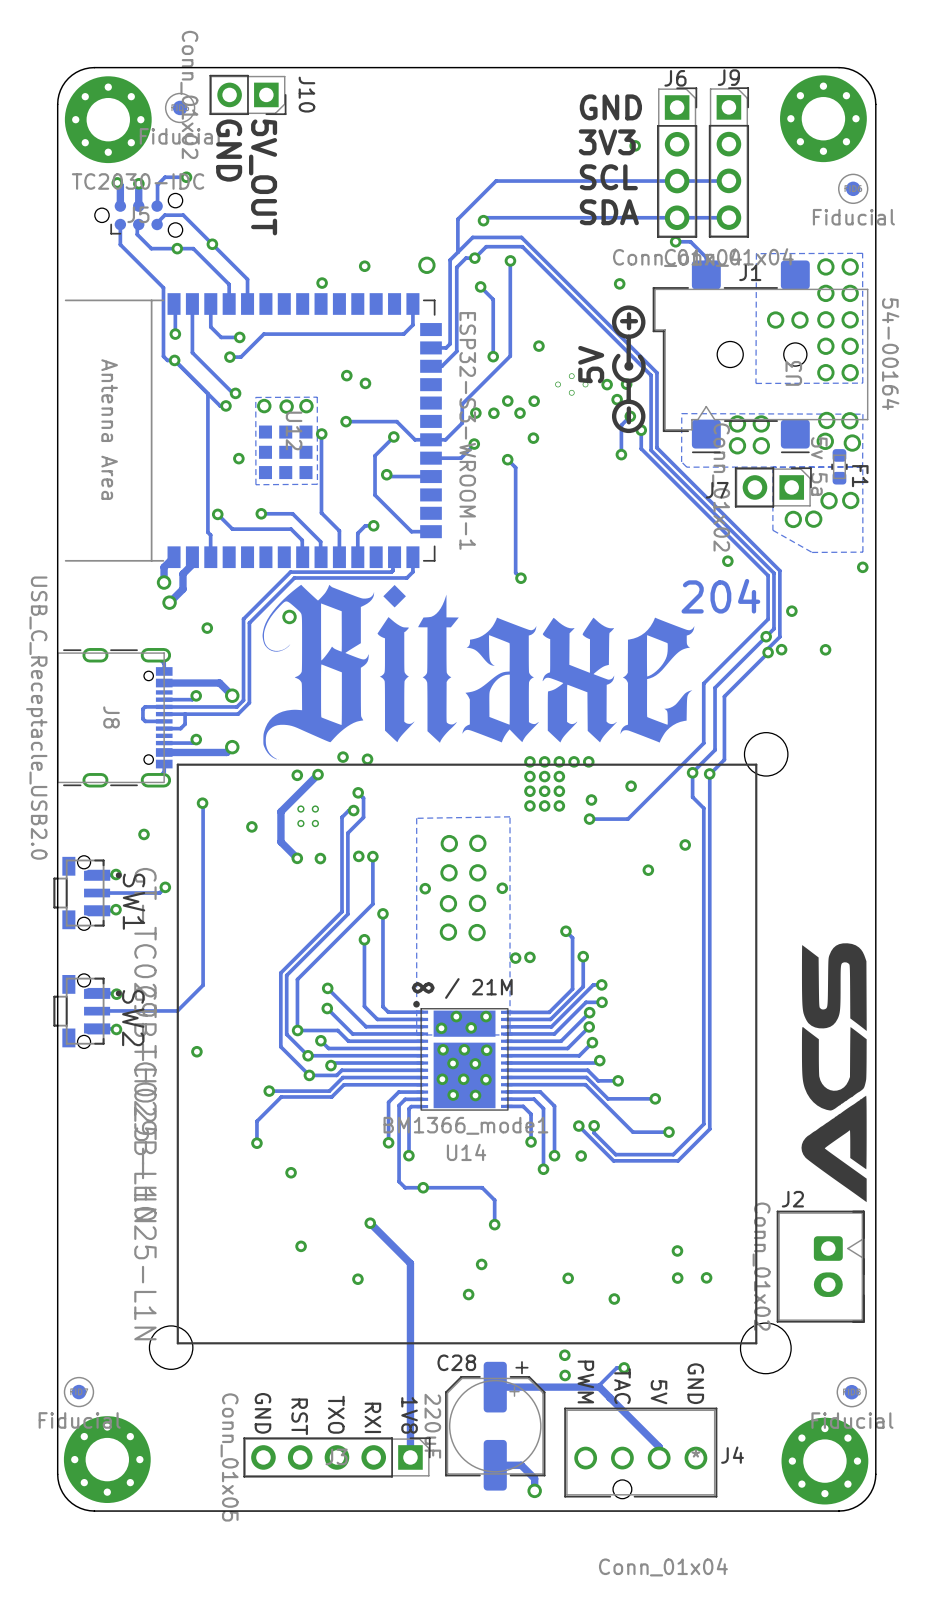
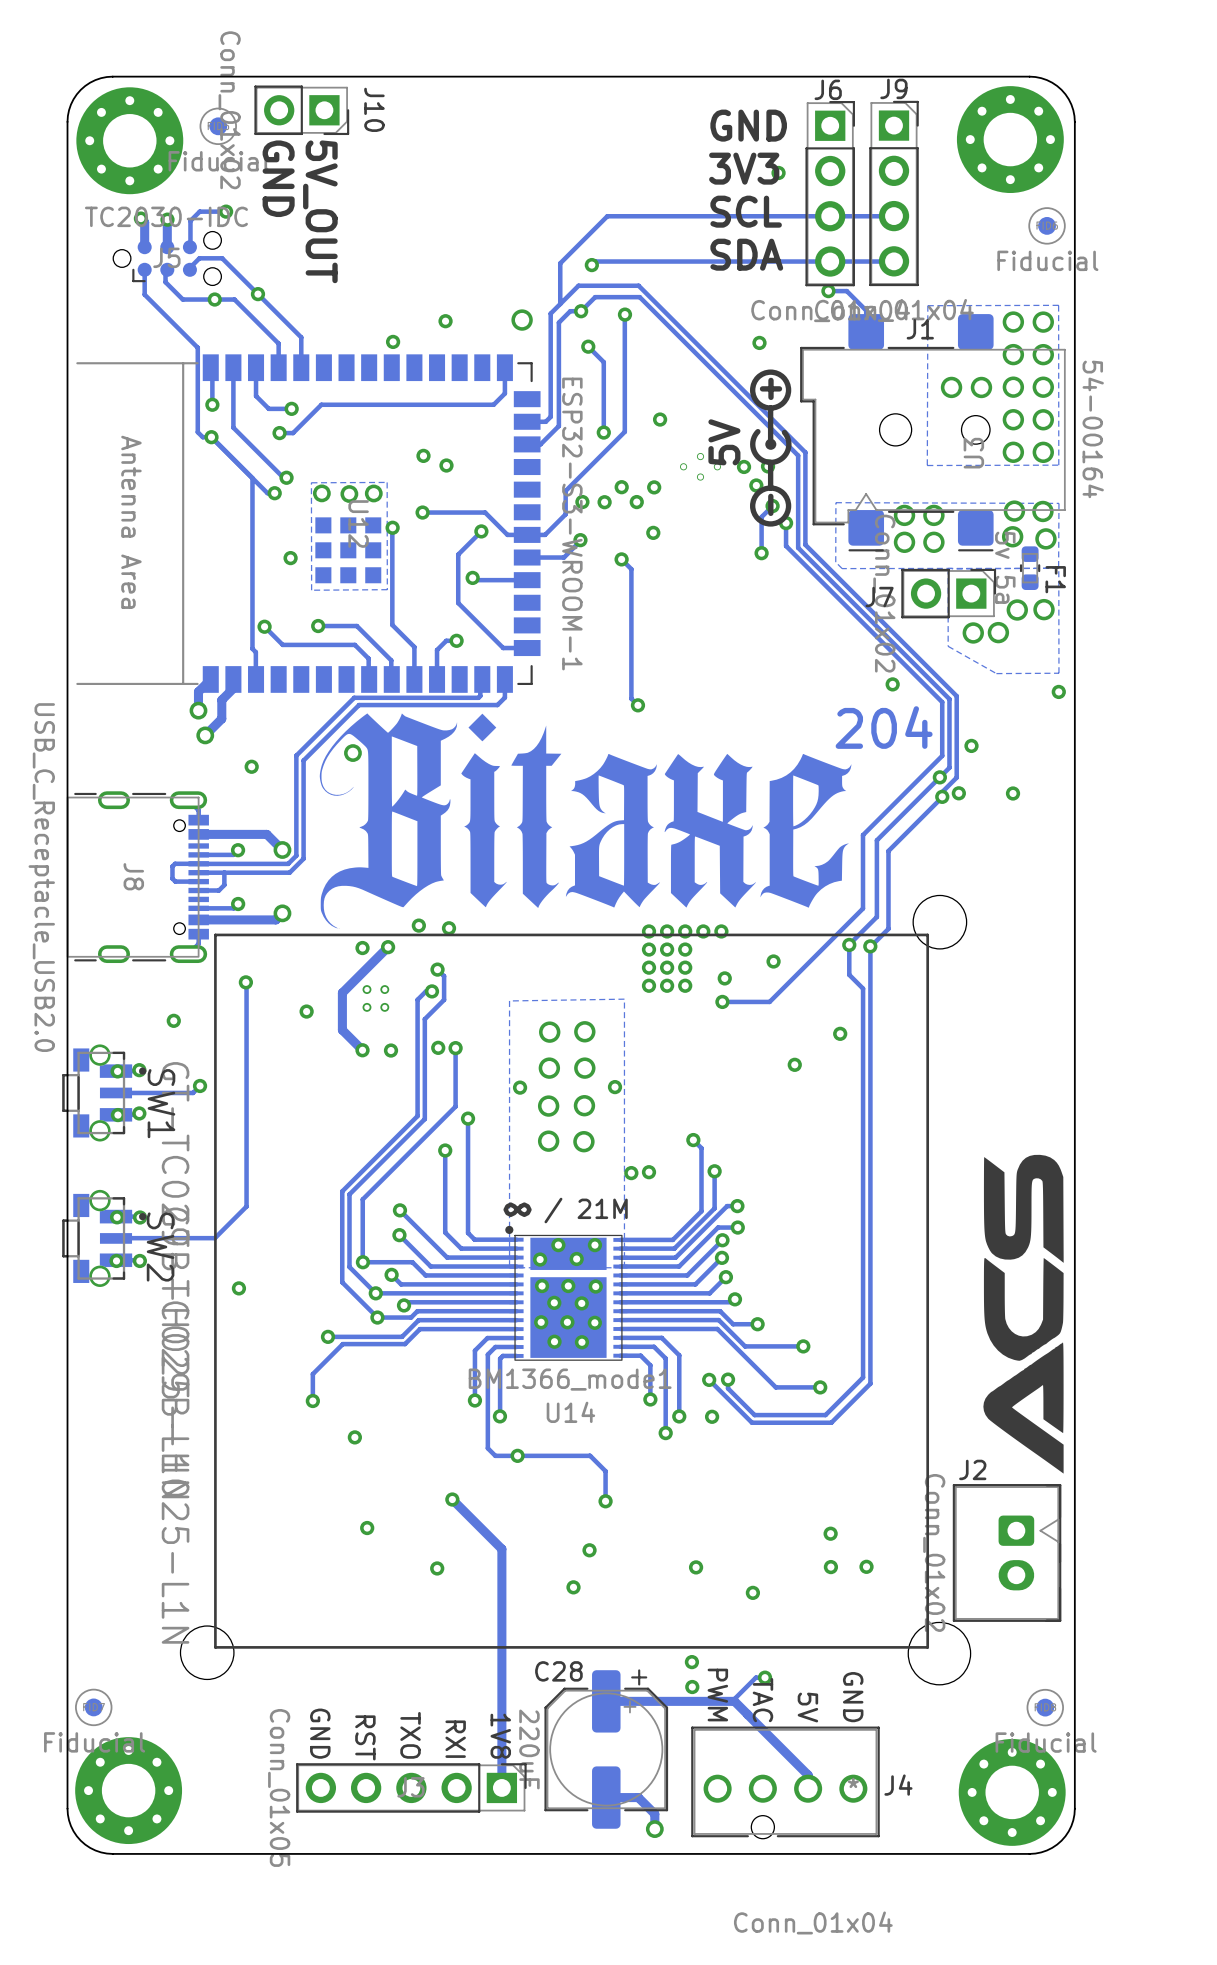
SW1 footprint: [53, 855, 122, 931] -> [62, 1044, 147, 1142]
via: none -> (117, 1071)
via: none -> (117, 1115)
SW2 footprint: [53, 973, 122, 1049] -> [62, 1189, 147, 1287]
via: none -> (117, 1217)
via: none -> (116, 1260)

